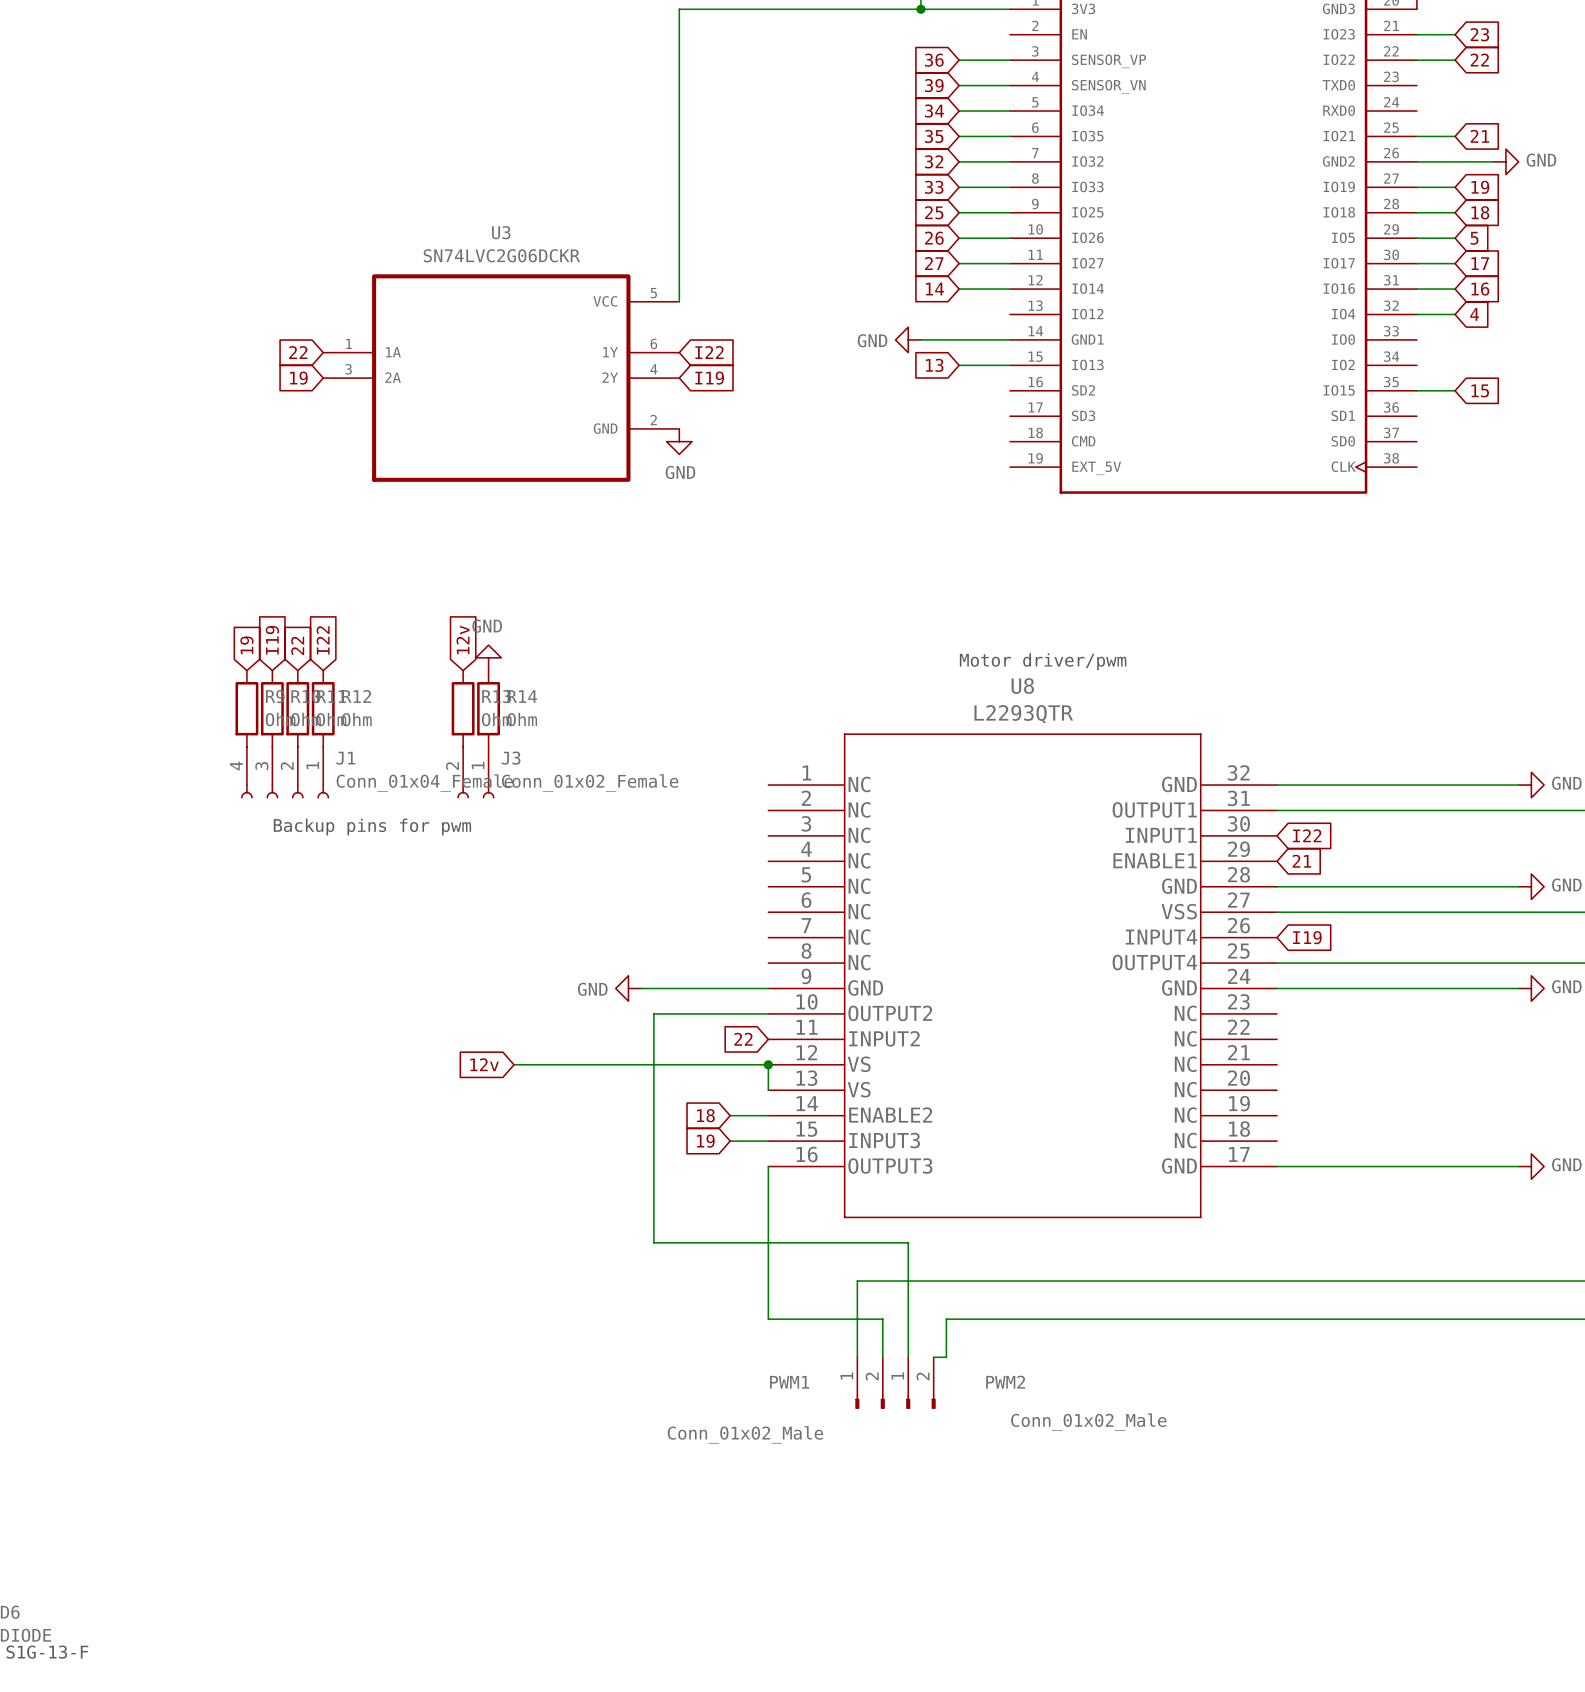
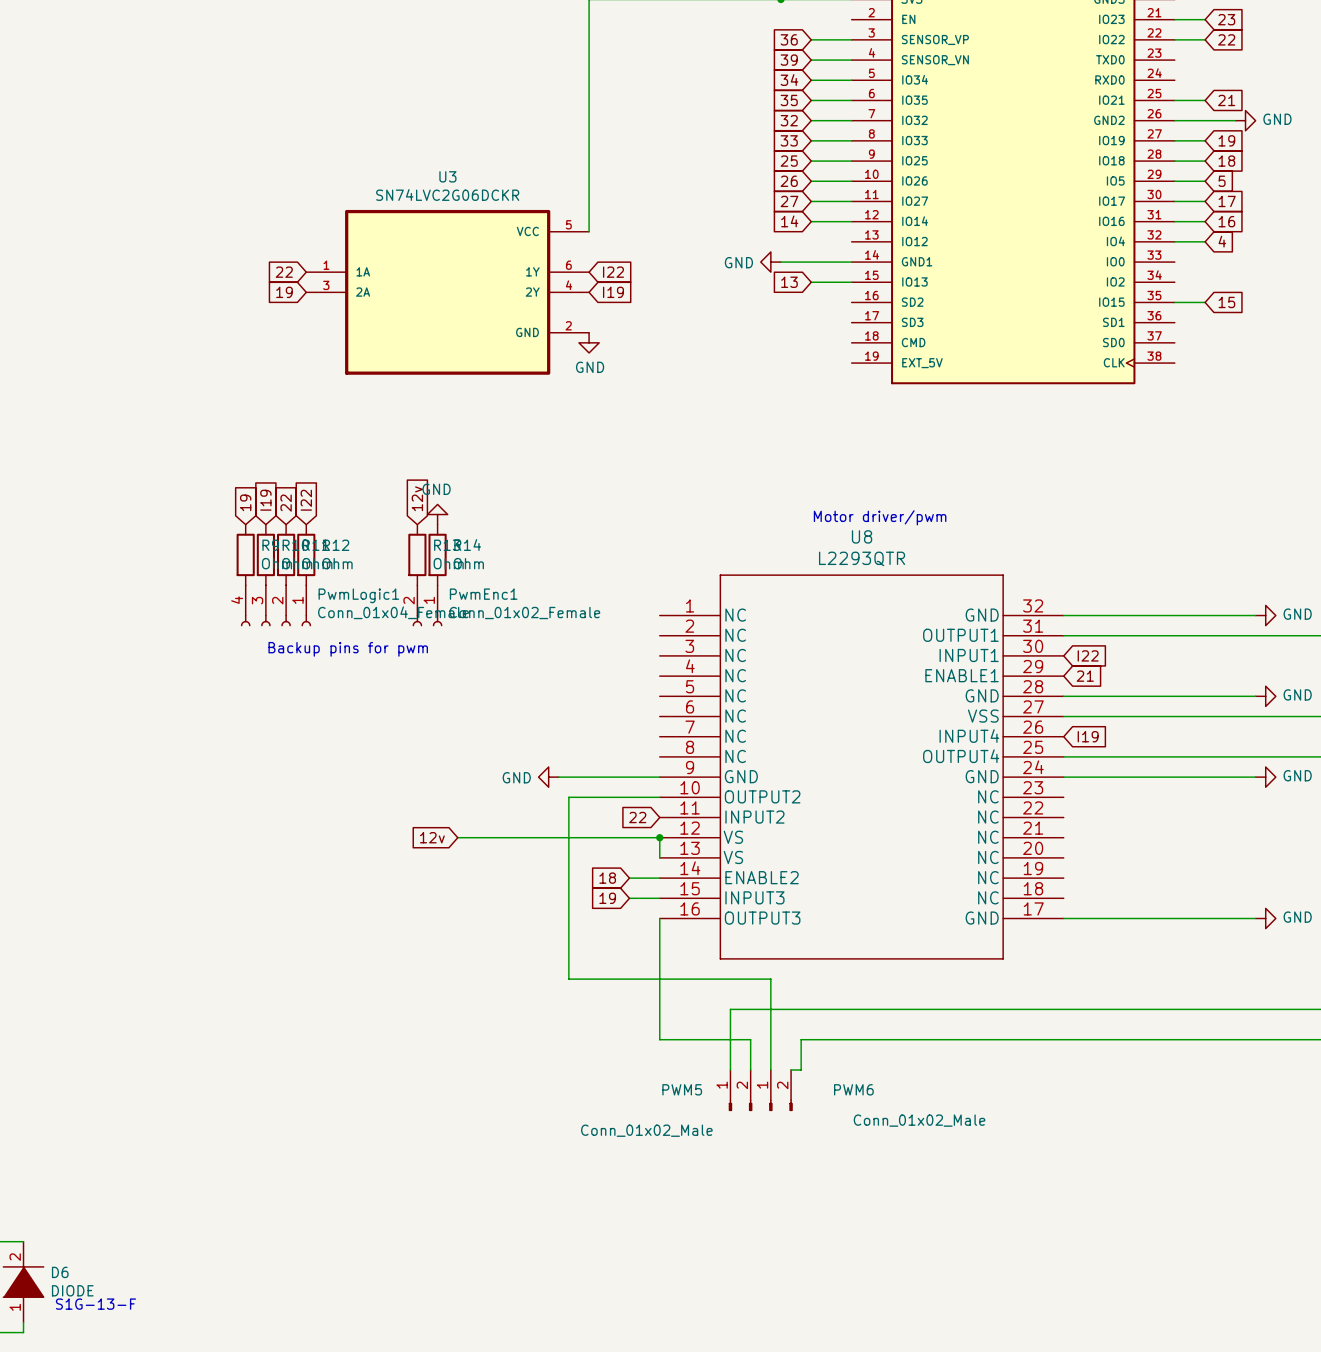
J1 name: J1 (345, 758) -> PwmLogic1 (358, 595)
J3 name: J3 (511, 758) -> PwmEnc1 (483, 594)
PWM1 name: PWM1 (789, 1382) -> PWM5 (682, 1089)
PWM2 name: PWM2 (1005, 1382) -> PWM6 (853, 1089)

